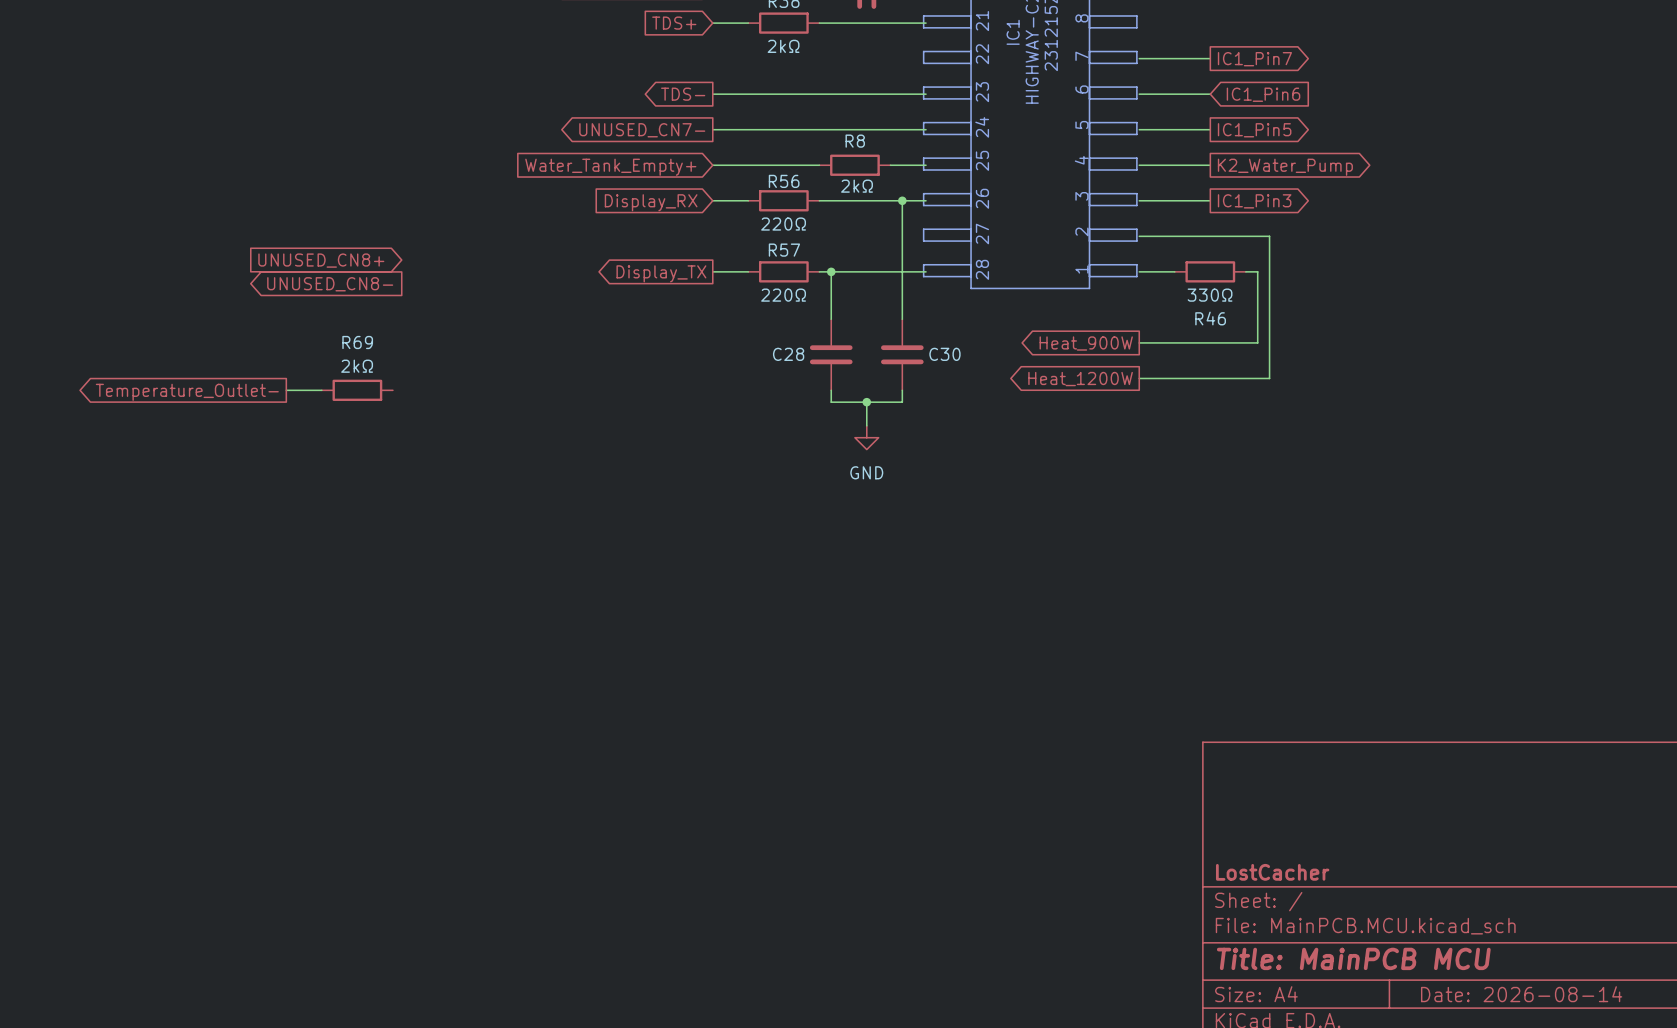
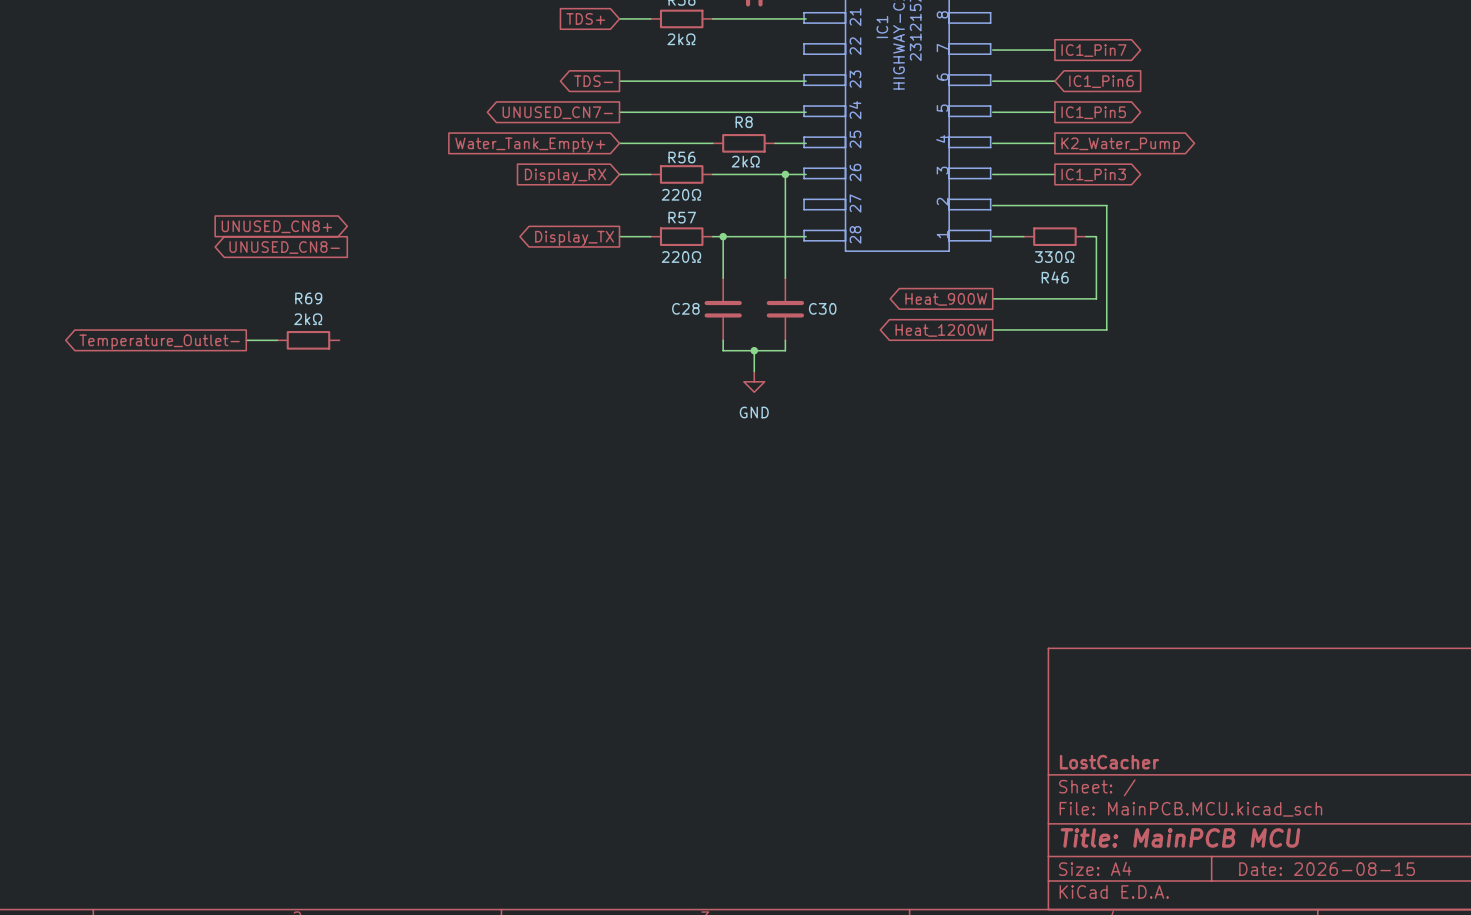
title block: Date: 2026-08-14 (1521, 994) -> Date: 2026-08-15 (1327, 869)

